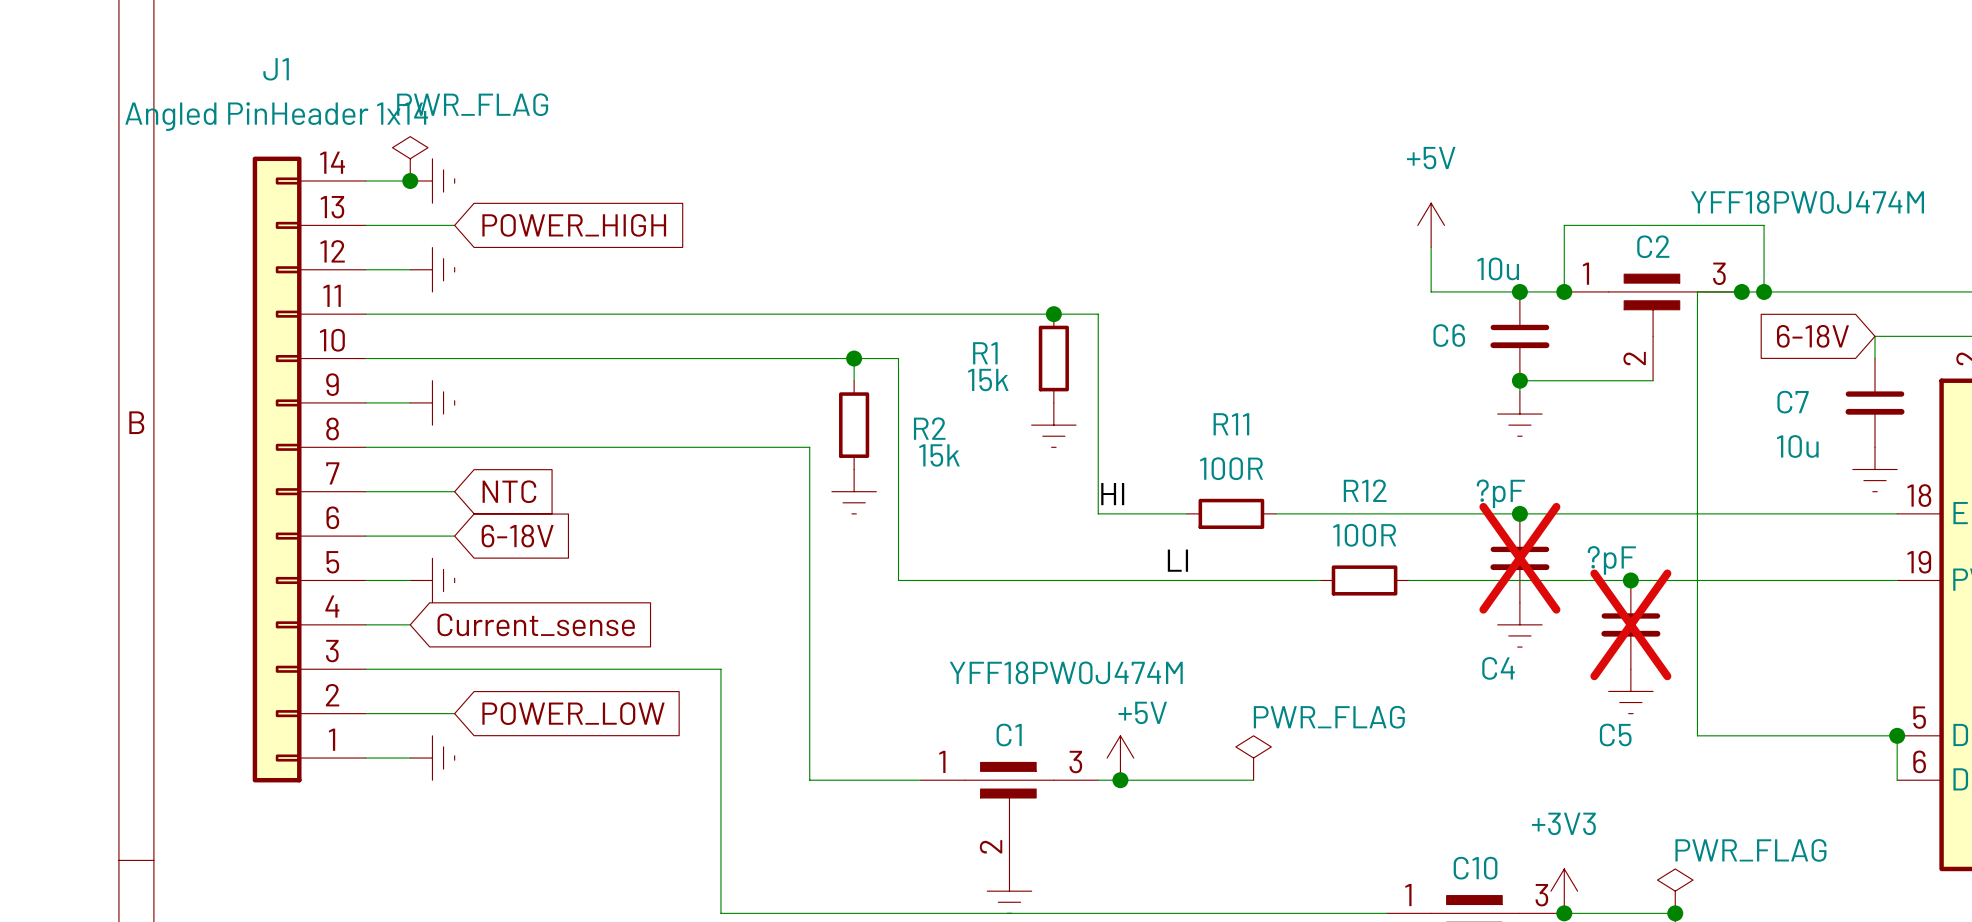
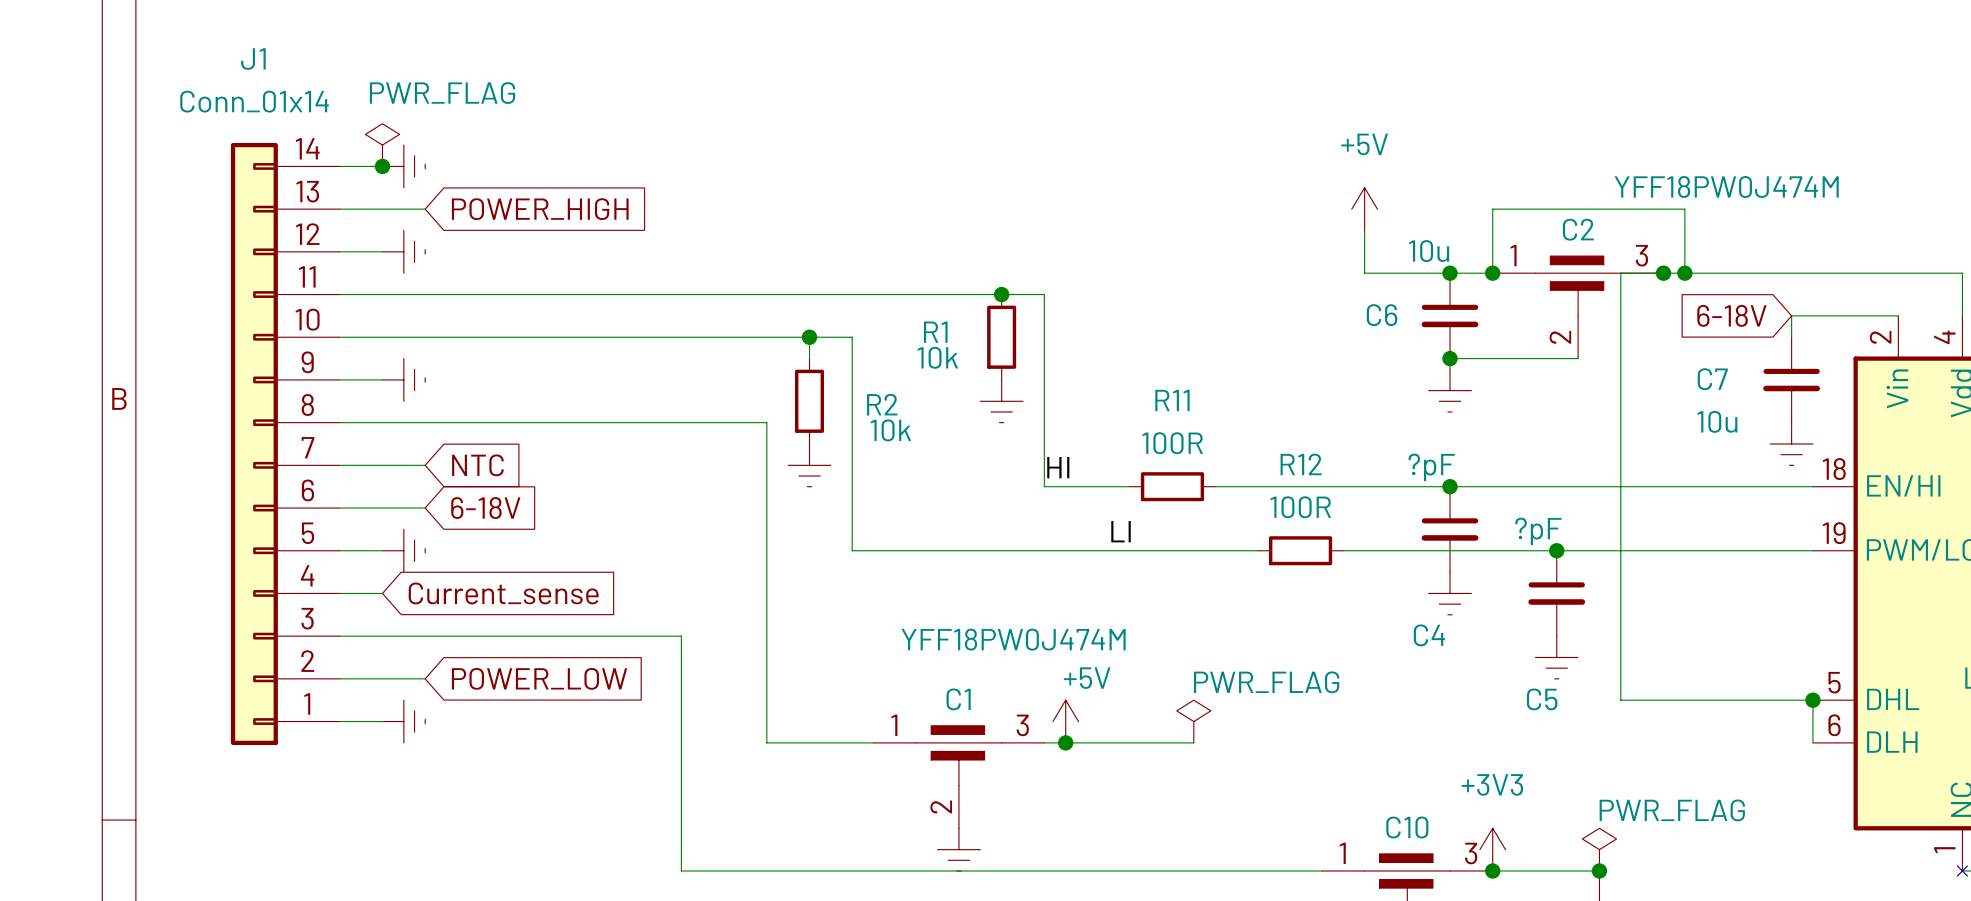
J1 value: Angled PinHeader 1x14 (276, 116) -> Conn_01x14 (254, 101)
R1 value: 15k (988, 380) -> 10k (937, 357)
R2 value: 15k (939, 455) -> 10k (890, 430)
C4 do-not-place cross: (1519, 558) -> none
C5 do-not-place cross: (1630, 624) -> none

